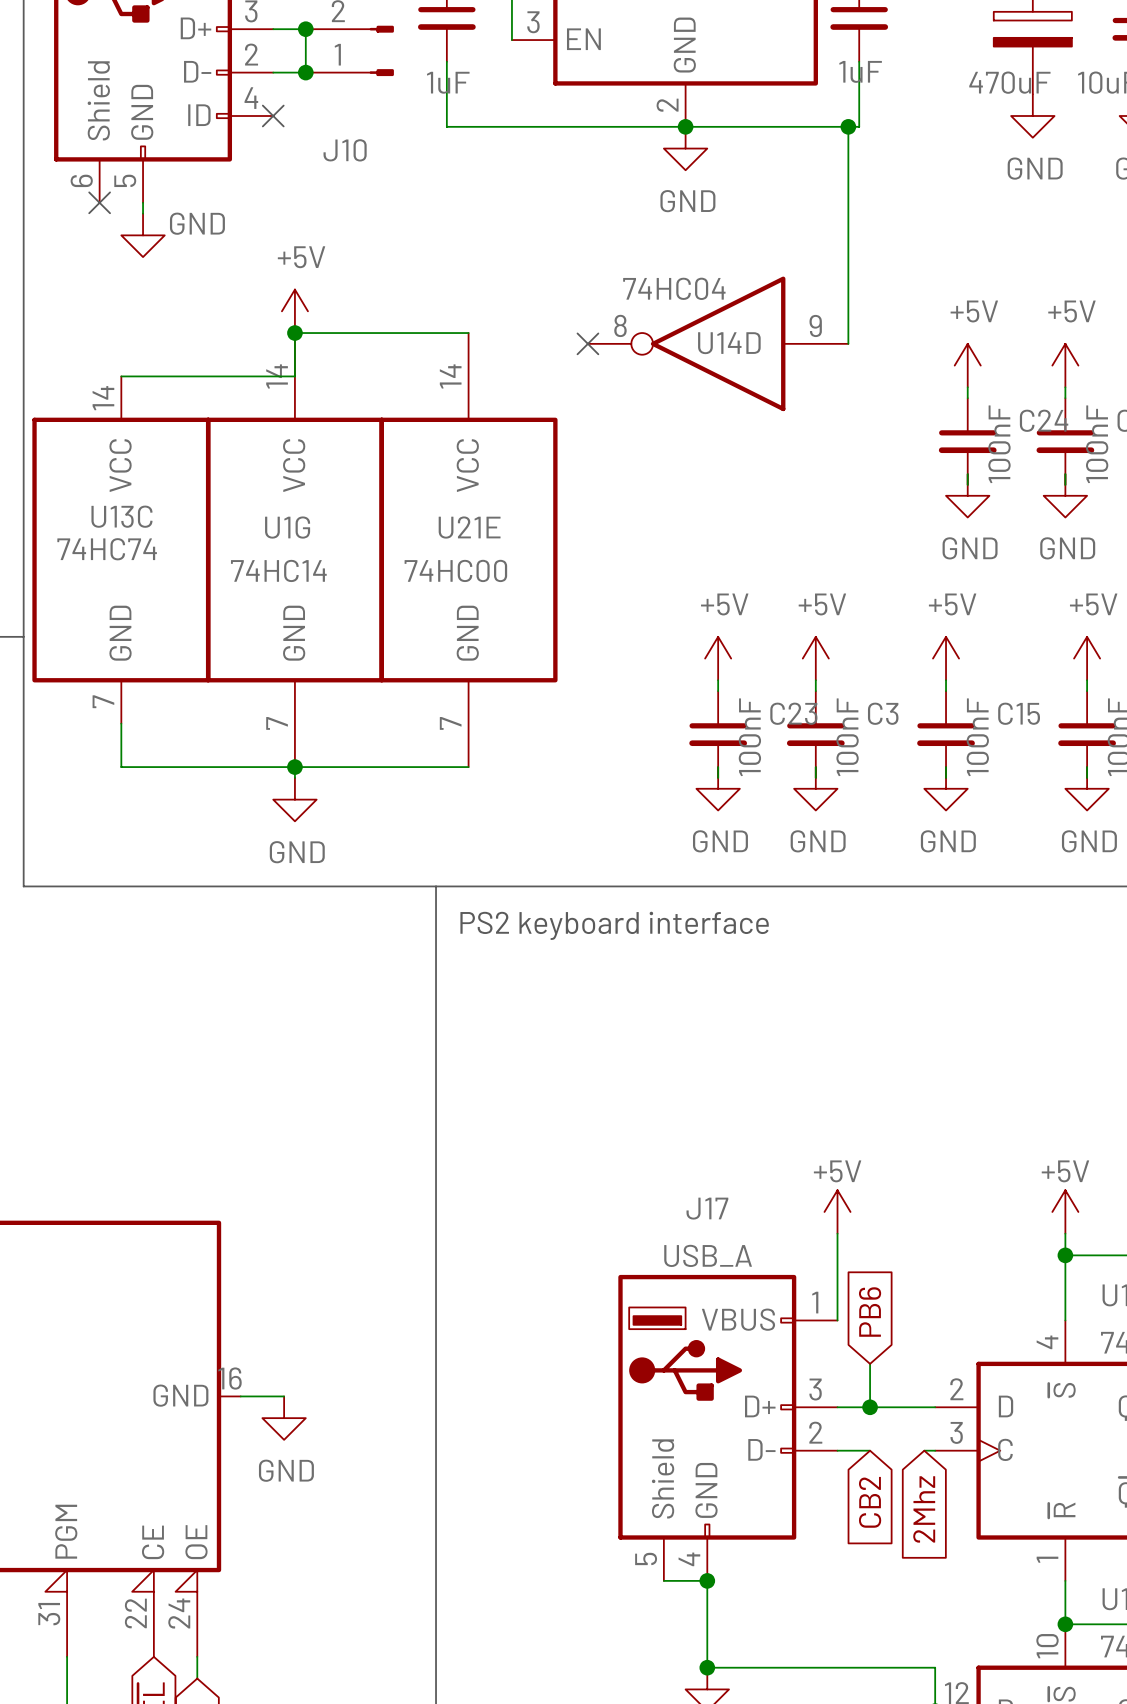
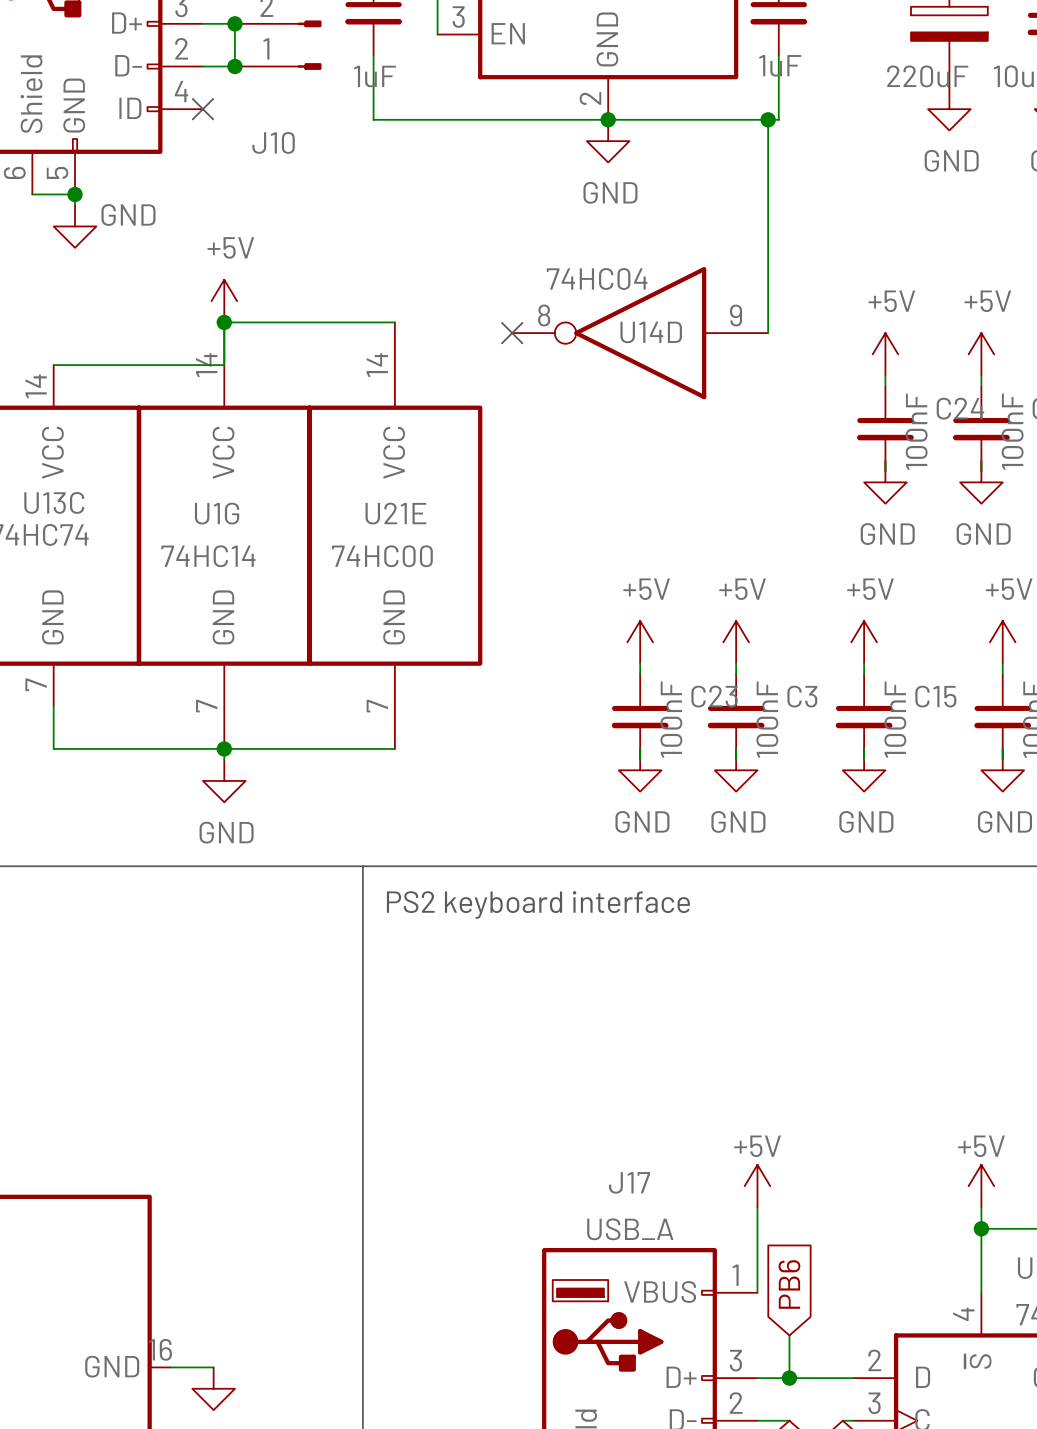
part value: 470uF (1009, 82) -> 220uF (927, 76)
wire: none -> (32, 194) (75, 194)
no-connect mark: (99, 202) -> none
junction: none -> (75, 194)

